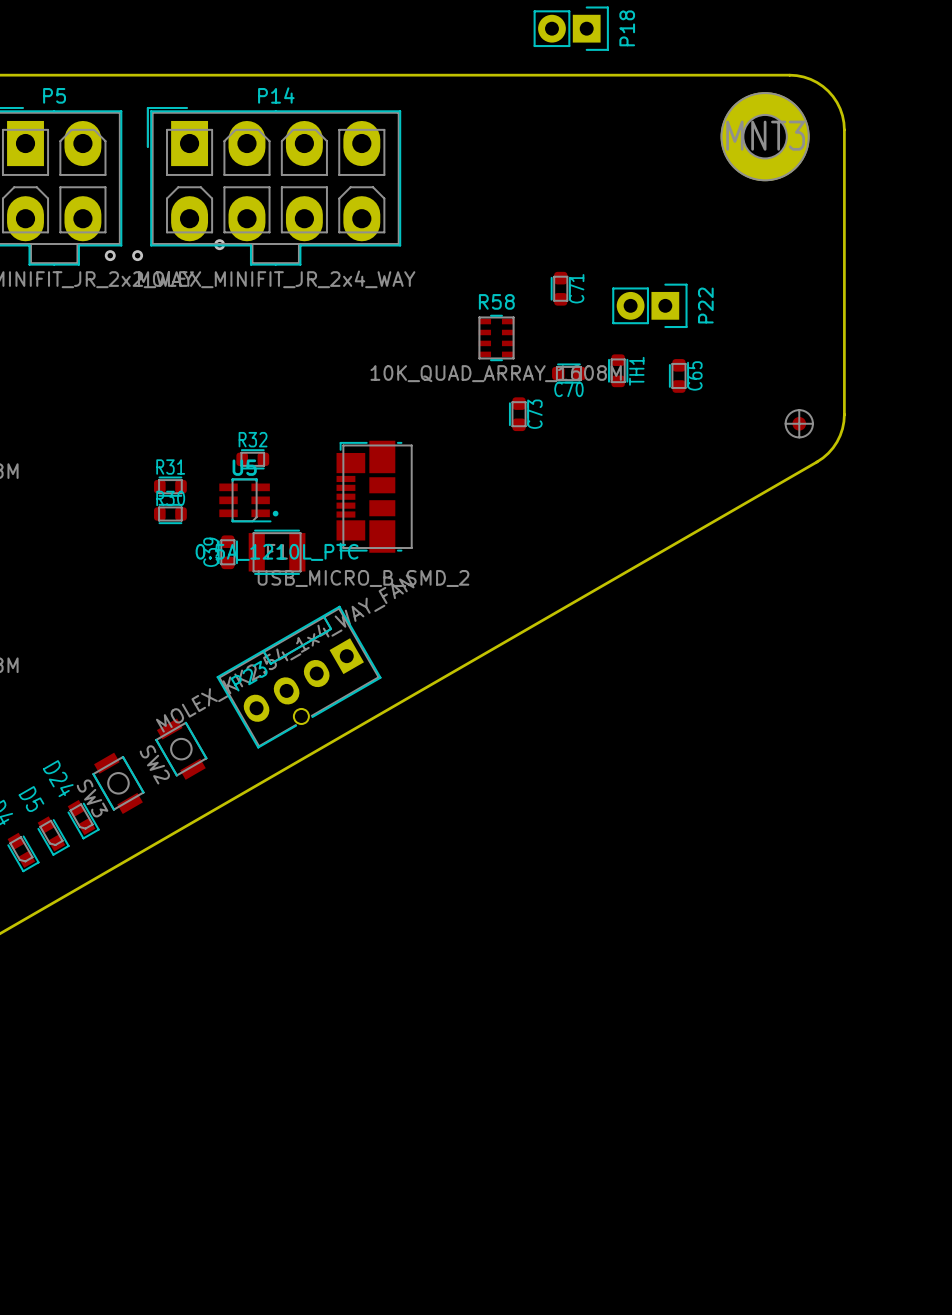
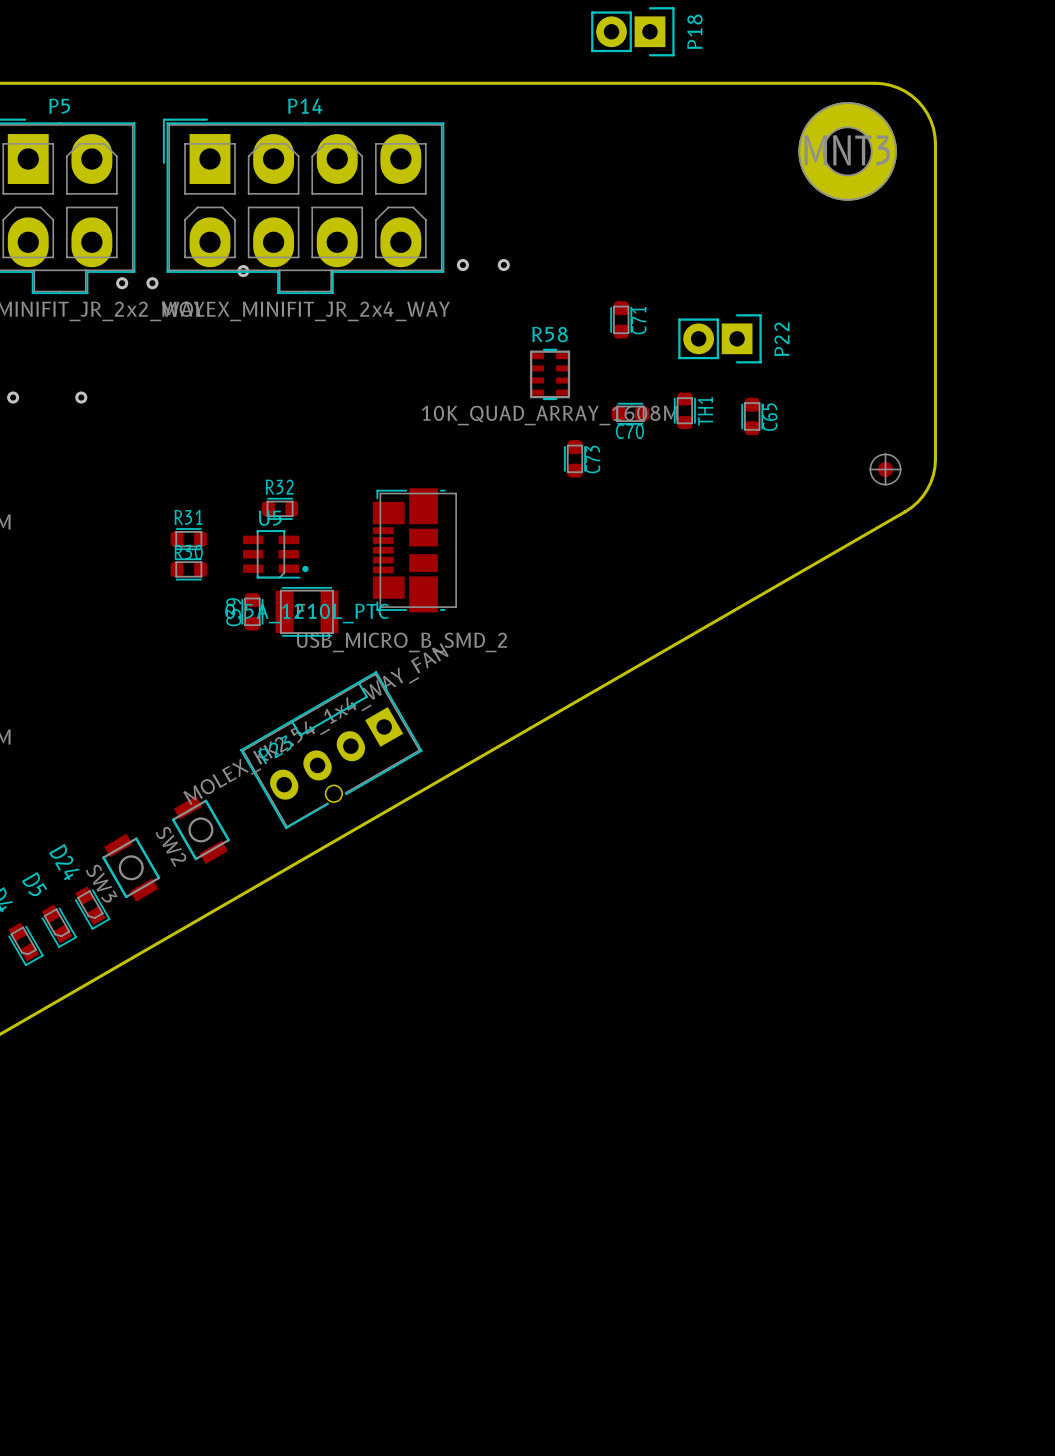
via: none -> (462, 265)
via: none -> (503, 265)
via: none -> (13, 397)
via: none -> (81, 397)

